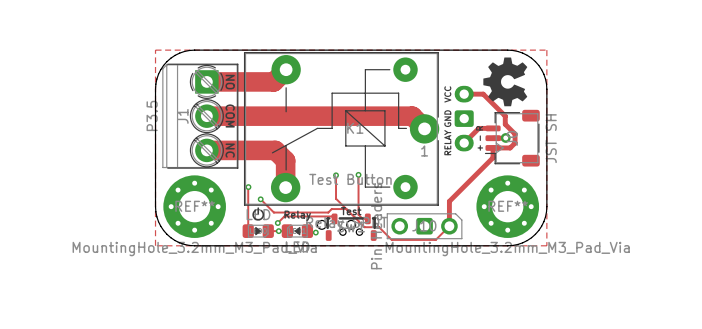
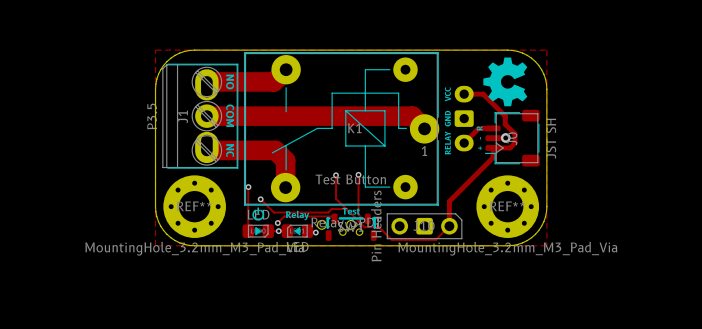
J1 footprint: [162, 63, 239, 169] -> [162, 63, 239, 169]

